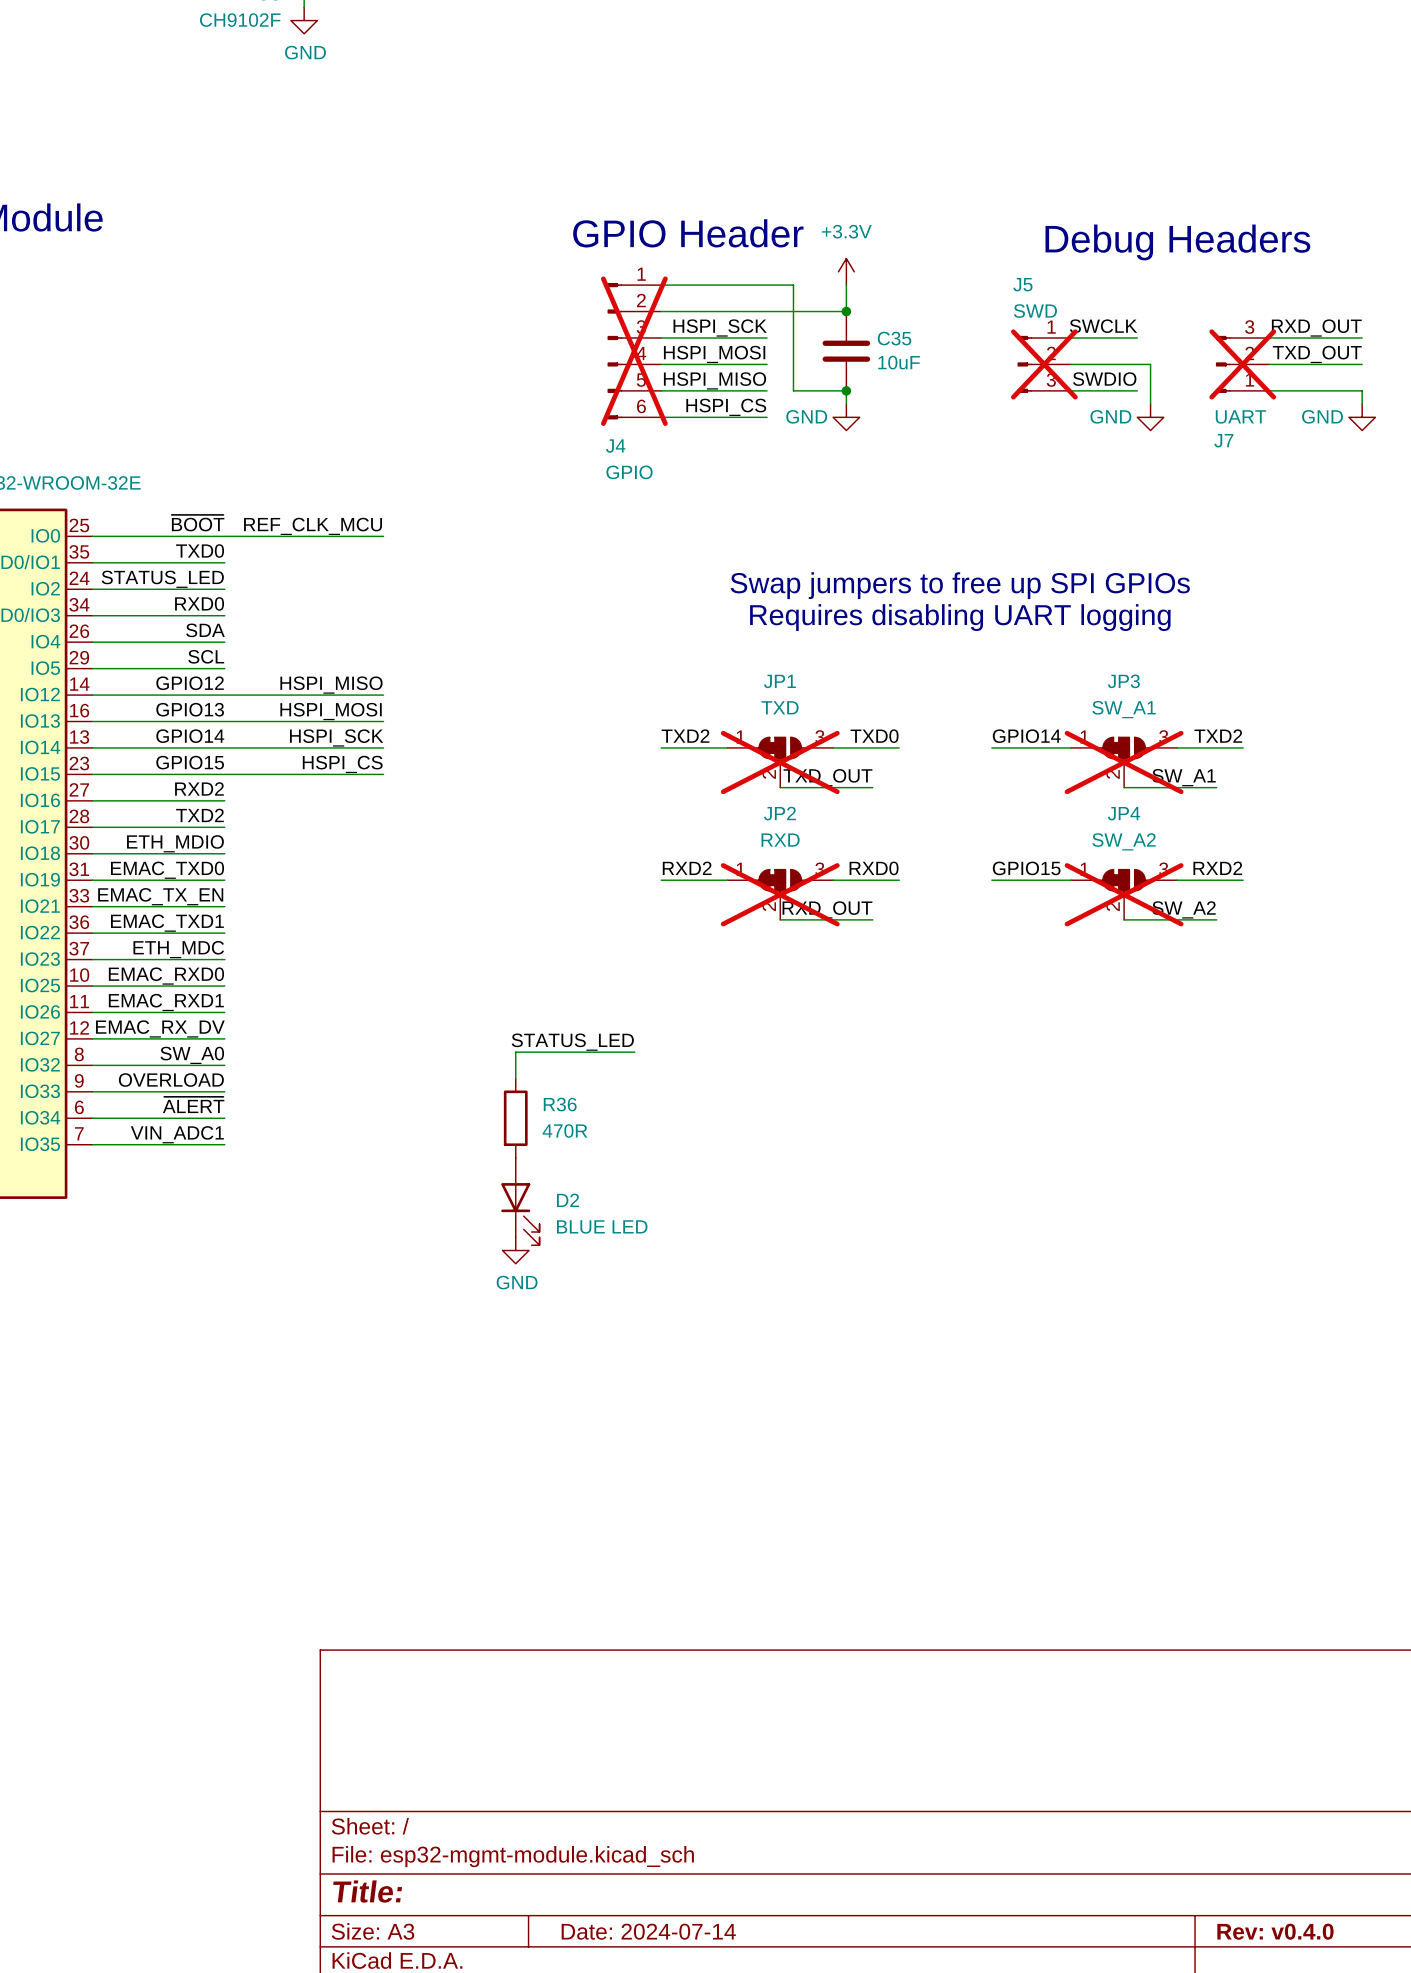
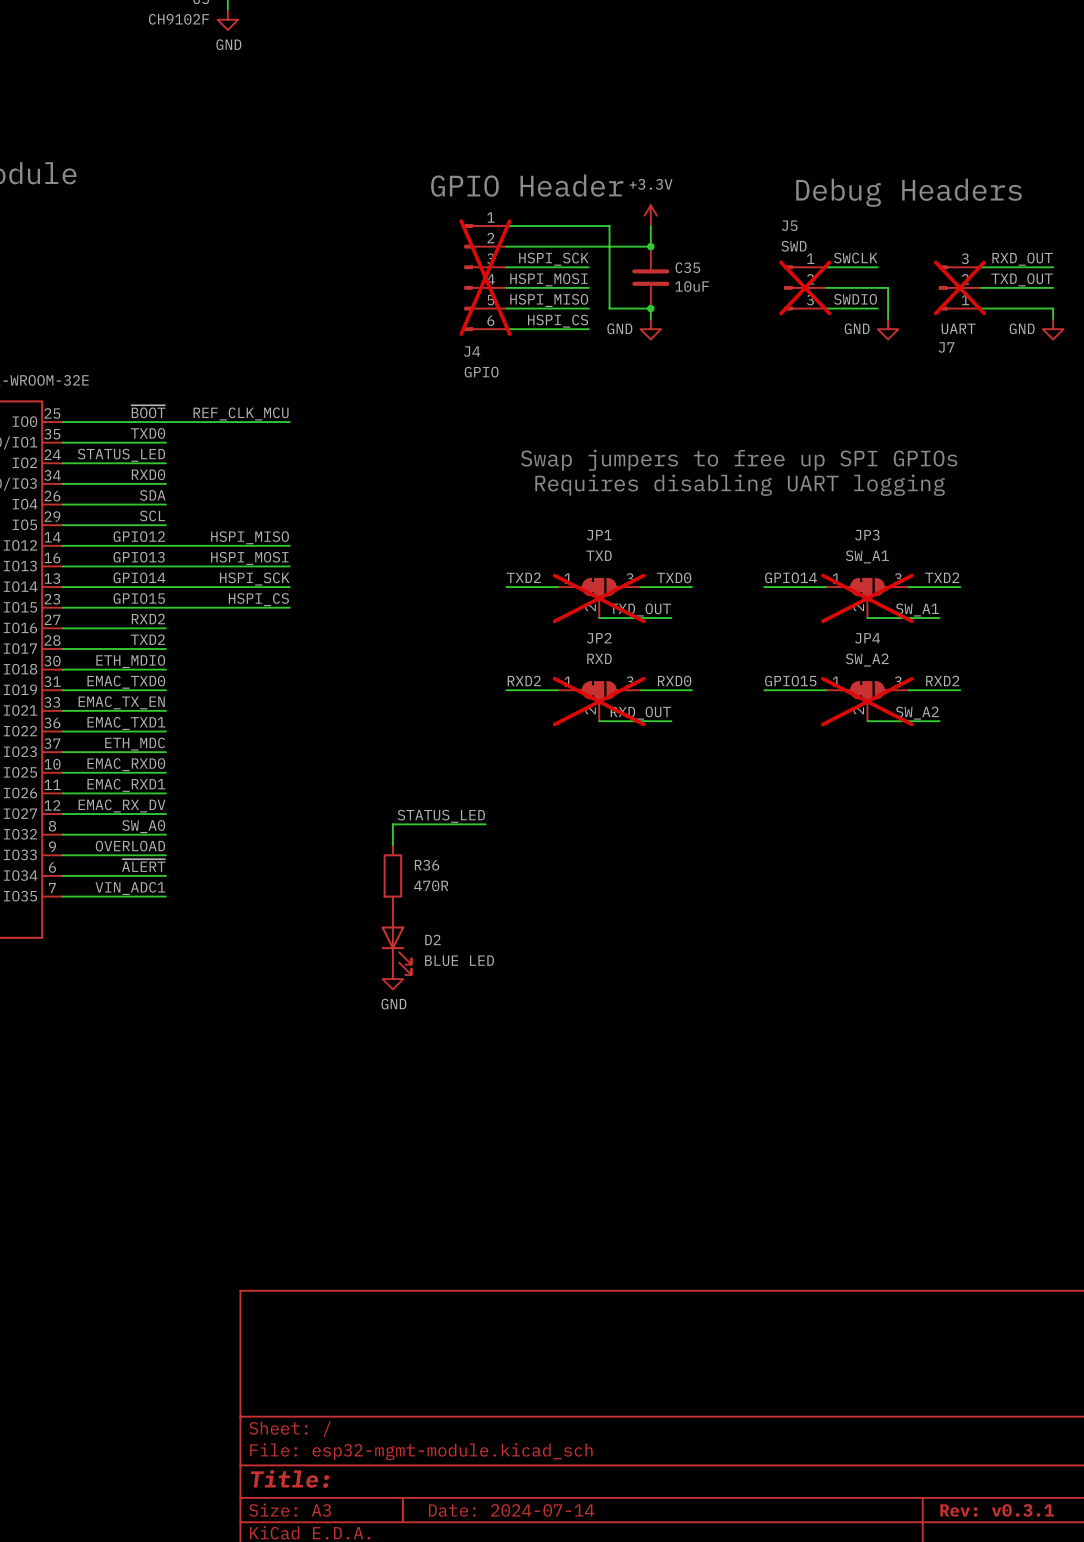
title block: Rev: v0.4.0 (1275, 1931) -> Rev: v0.3.1 (997, 1510)

